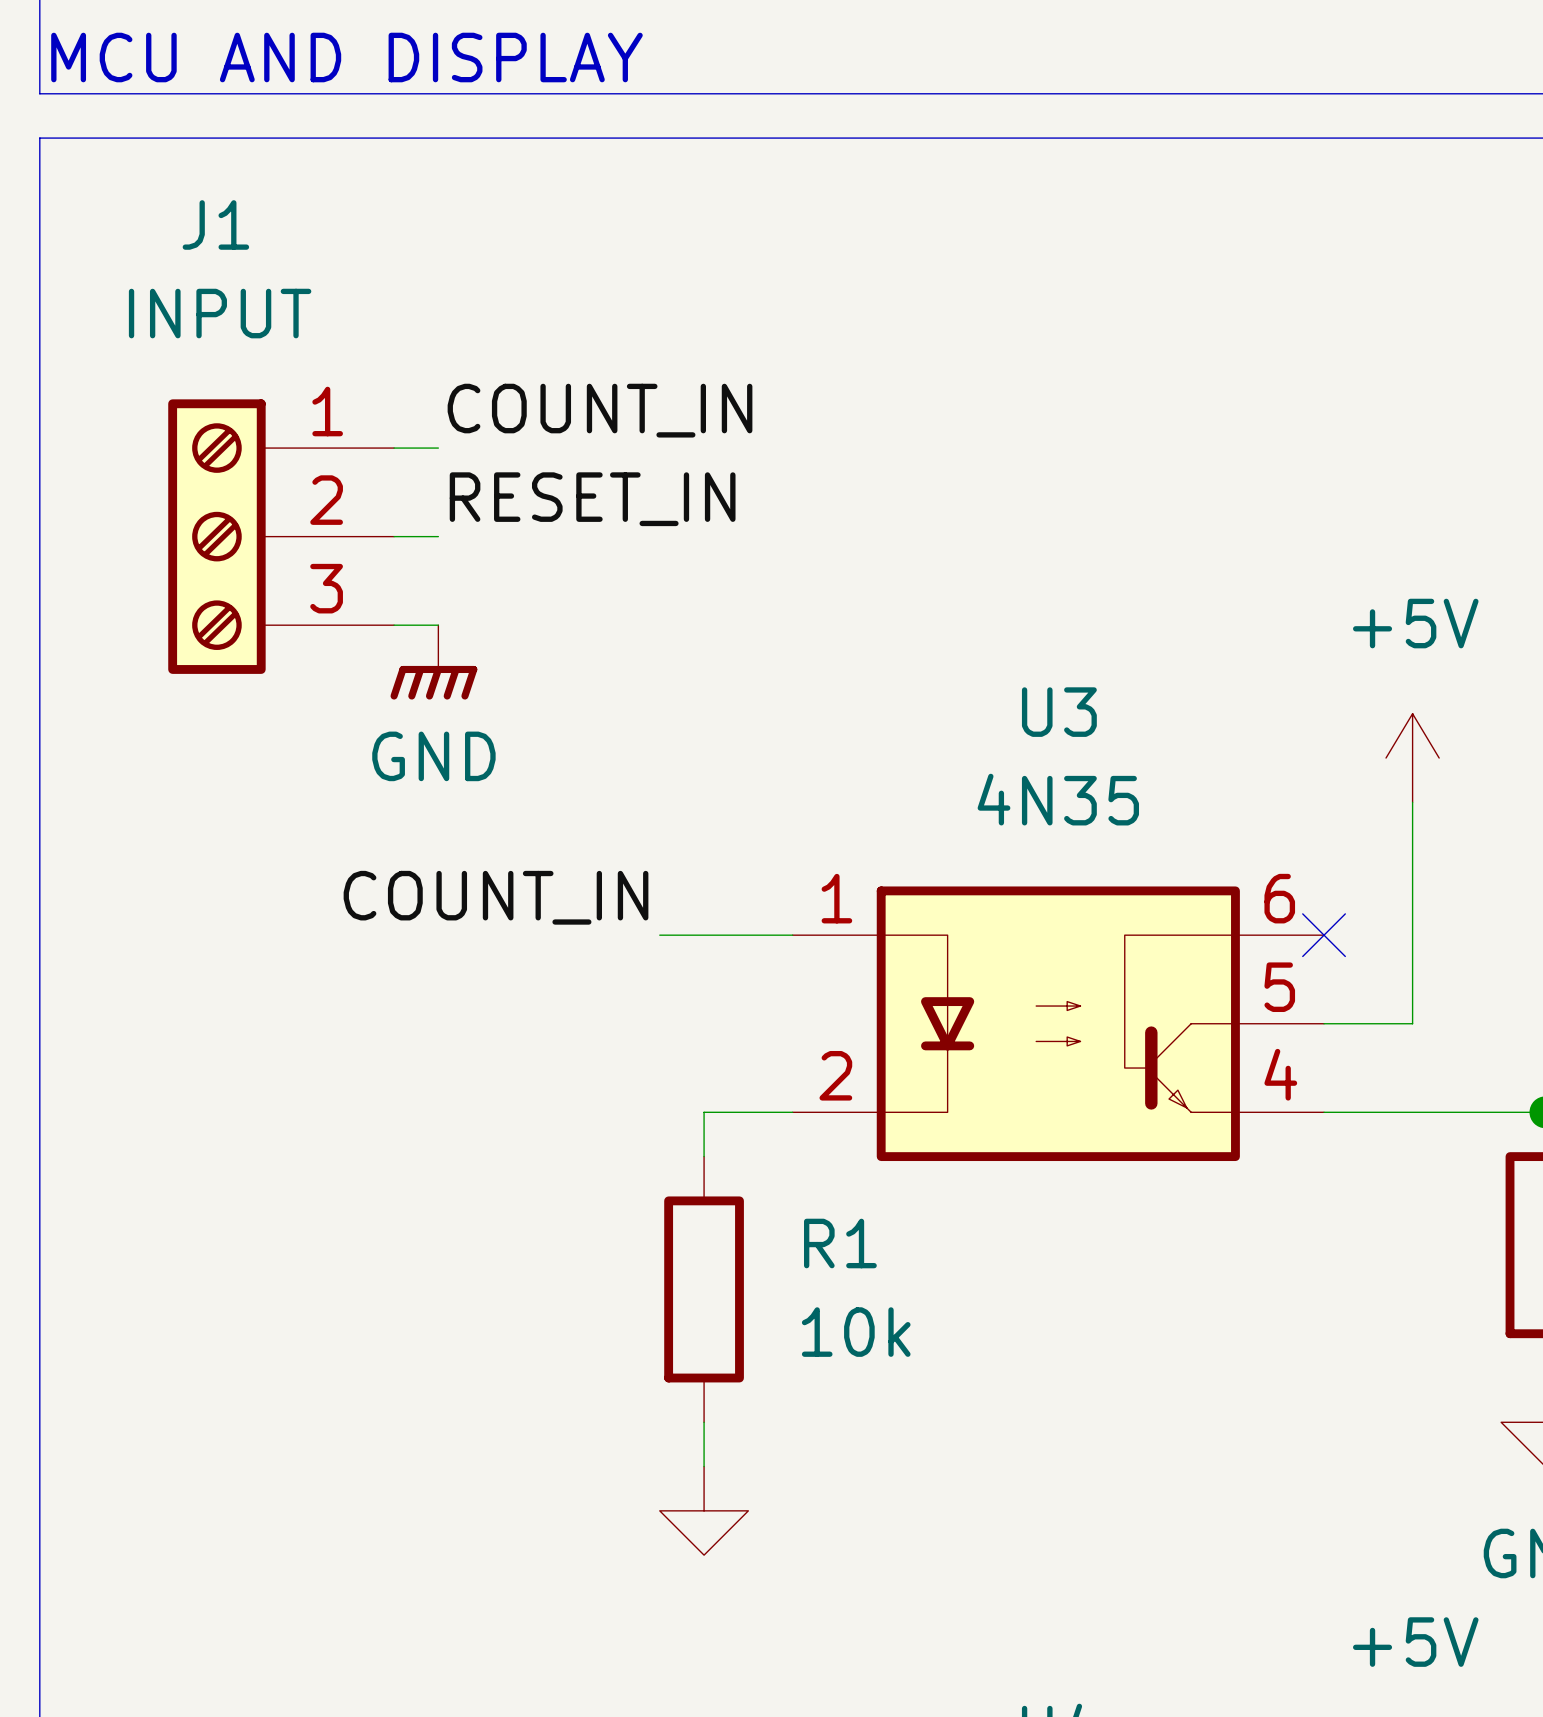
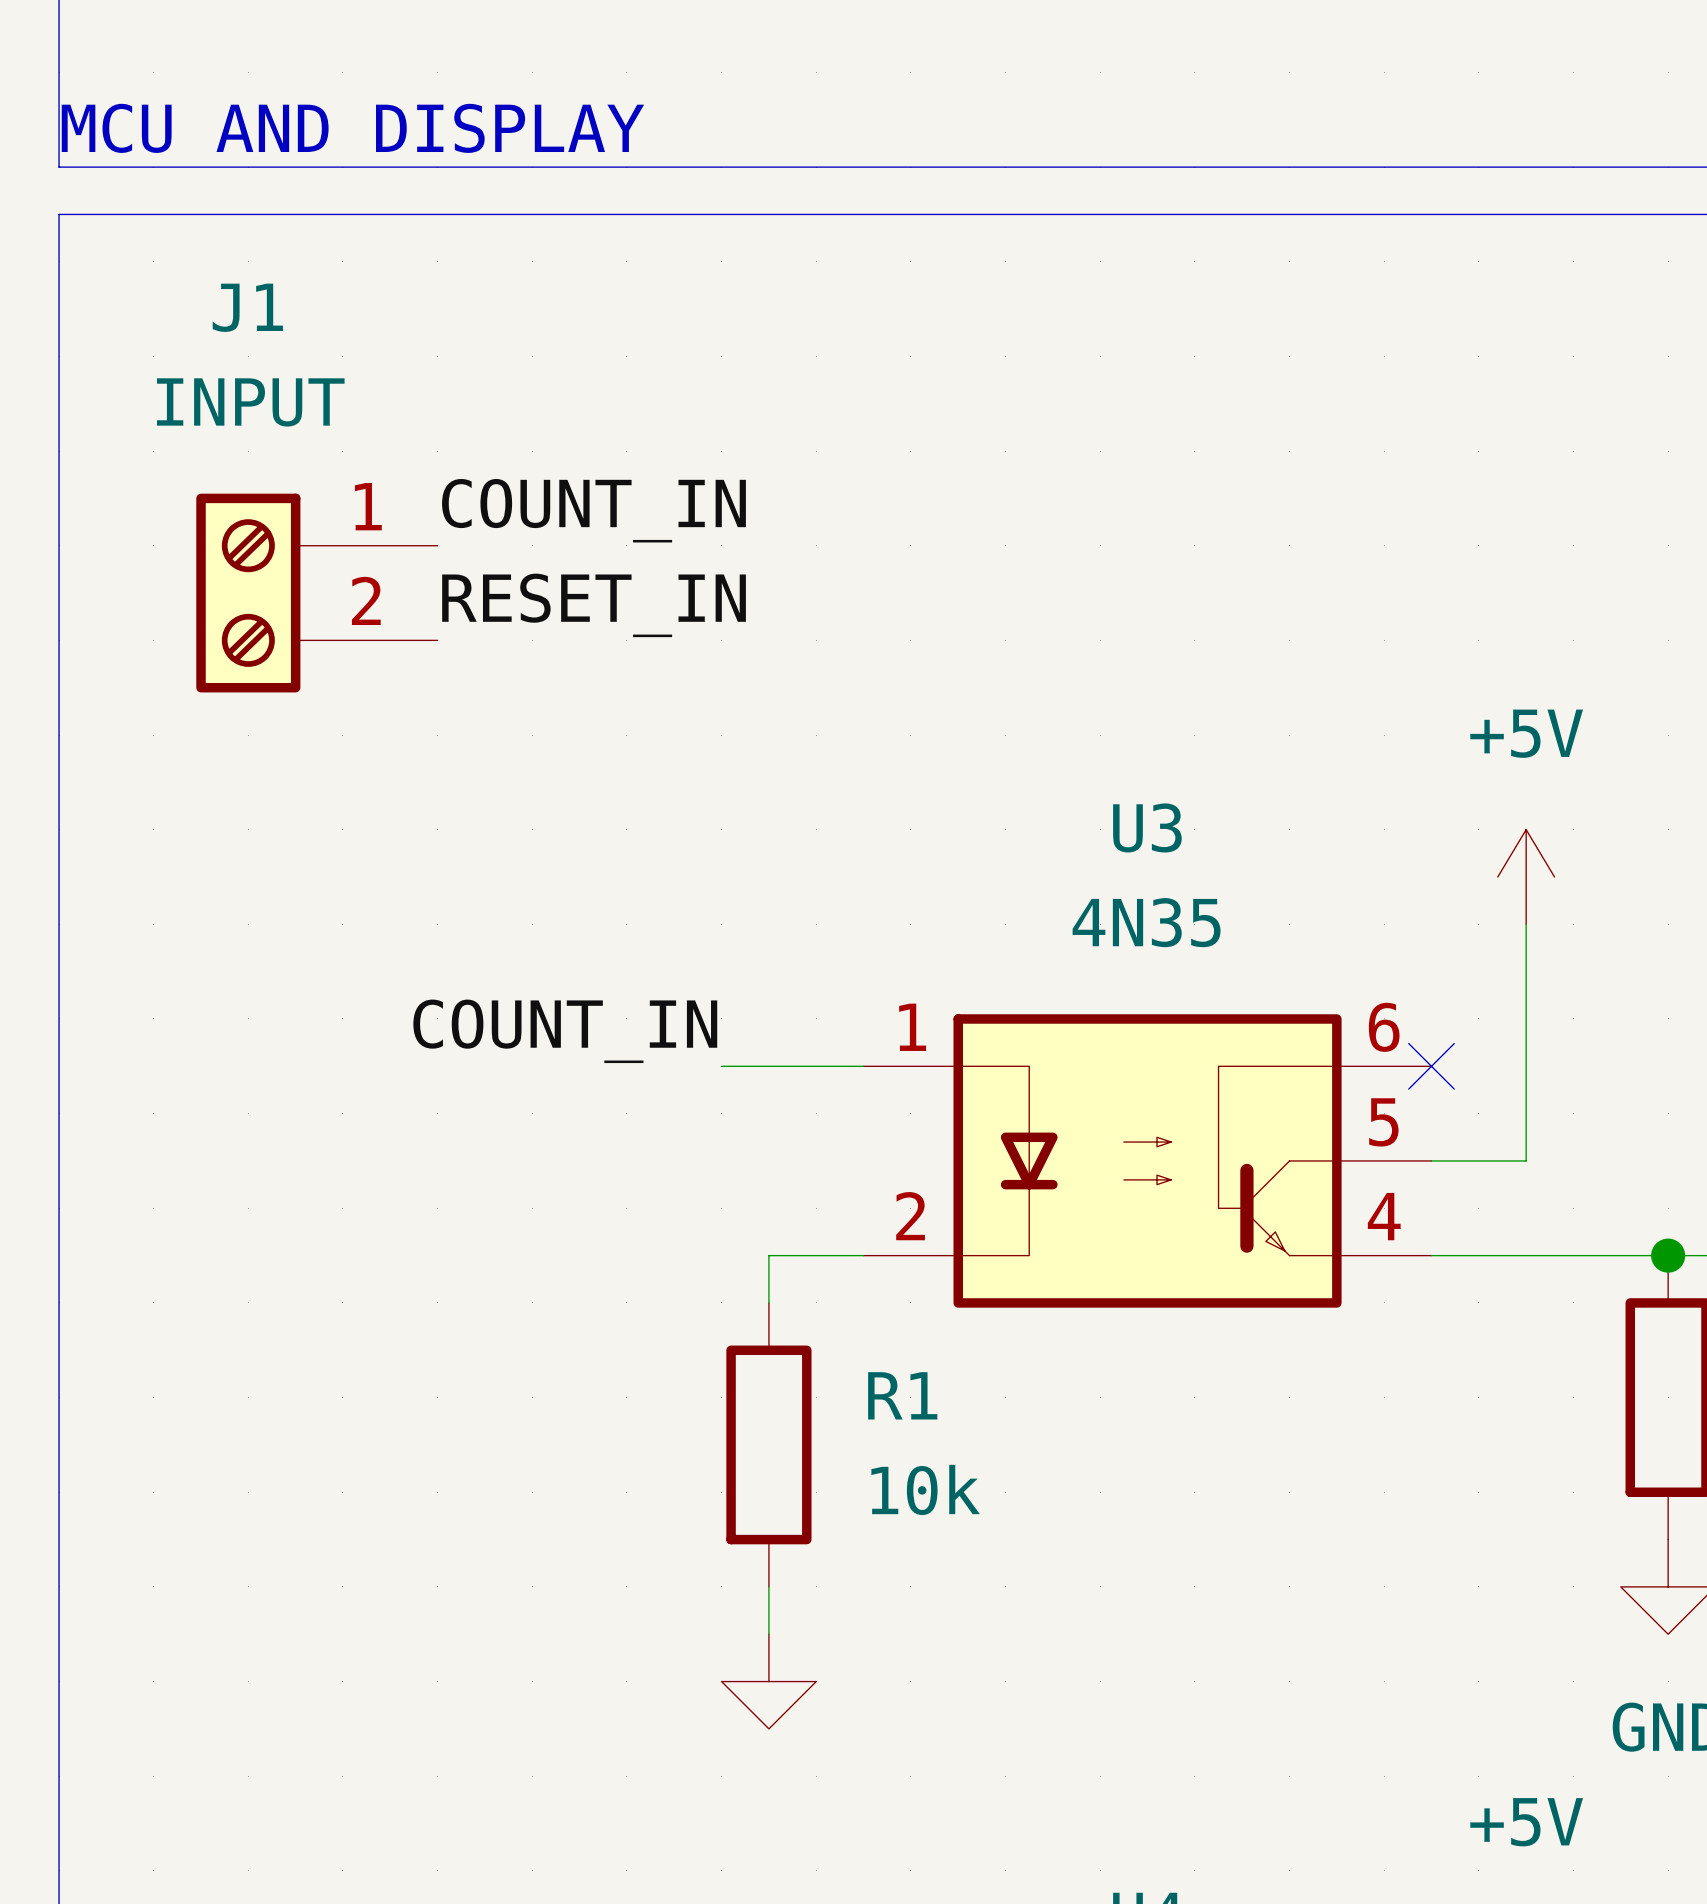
J1 symbol: [168, 399, 395, 674] -> [196, 493, 438, 693]
label position: COUNT_IN (600, 410) -> COUNT_IN (593, 510)
wire: (394, 448) (438, 448) -> none
label position: RESET_IN (592, 499) -> RESET_IN (594, 605)
wire: (394, 536) (438, 536) -> none
wire: (394, 625) (438, 625) -> none
power symbol: GND (433, 662) -> none

